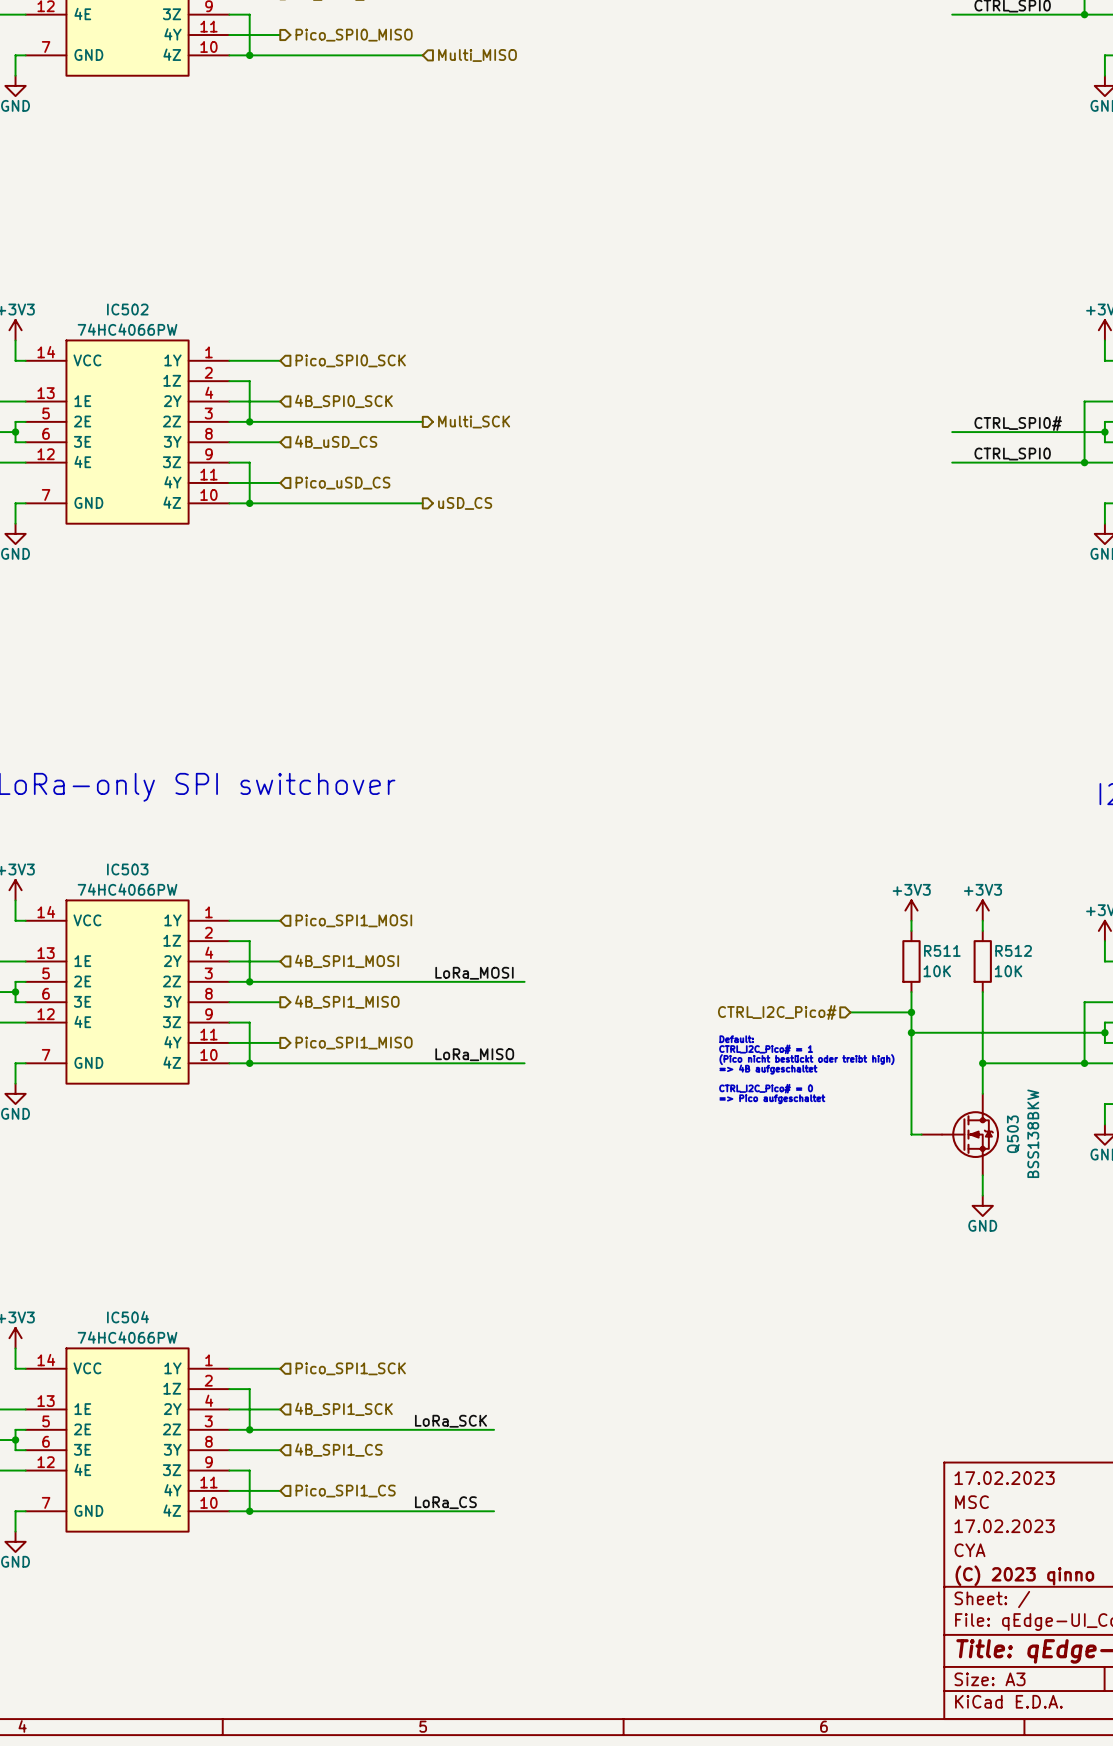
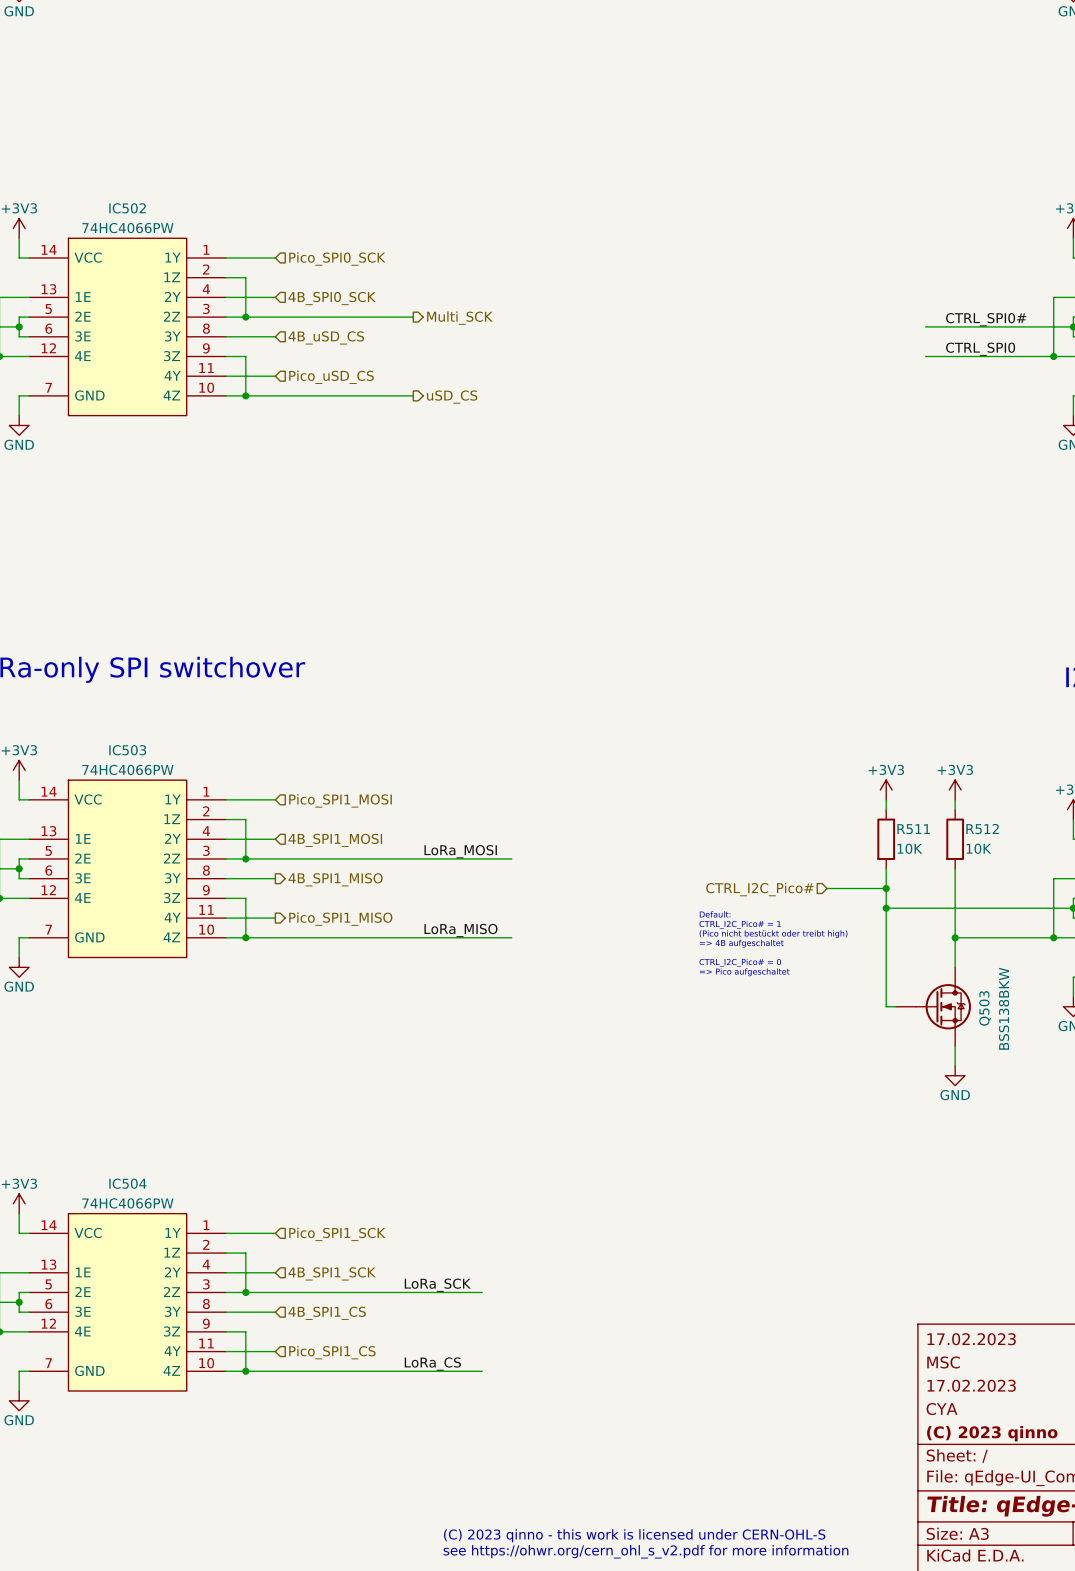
text: none -> (C) 2023 qinno - this work is licensed under CERN-OHL-S (634, 1535)
text: none -> see https://ohwr.org/cern_ohl_s_v2.pdf for more information (645, 1551)

